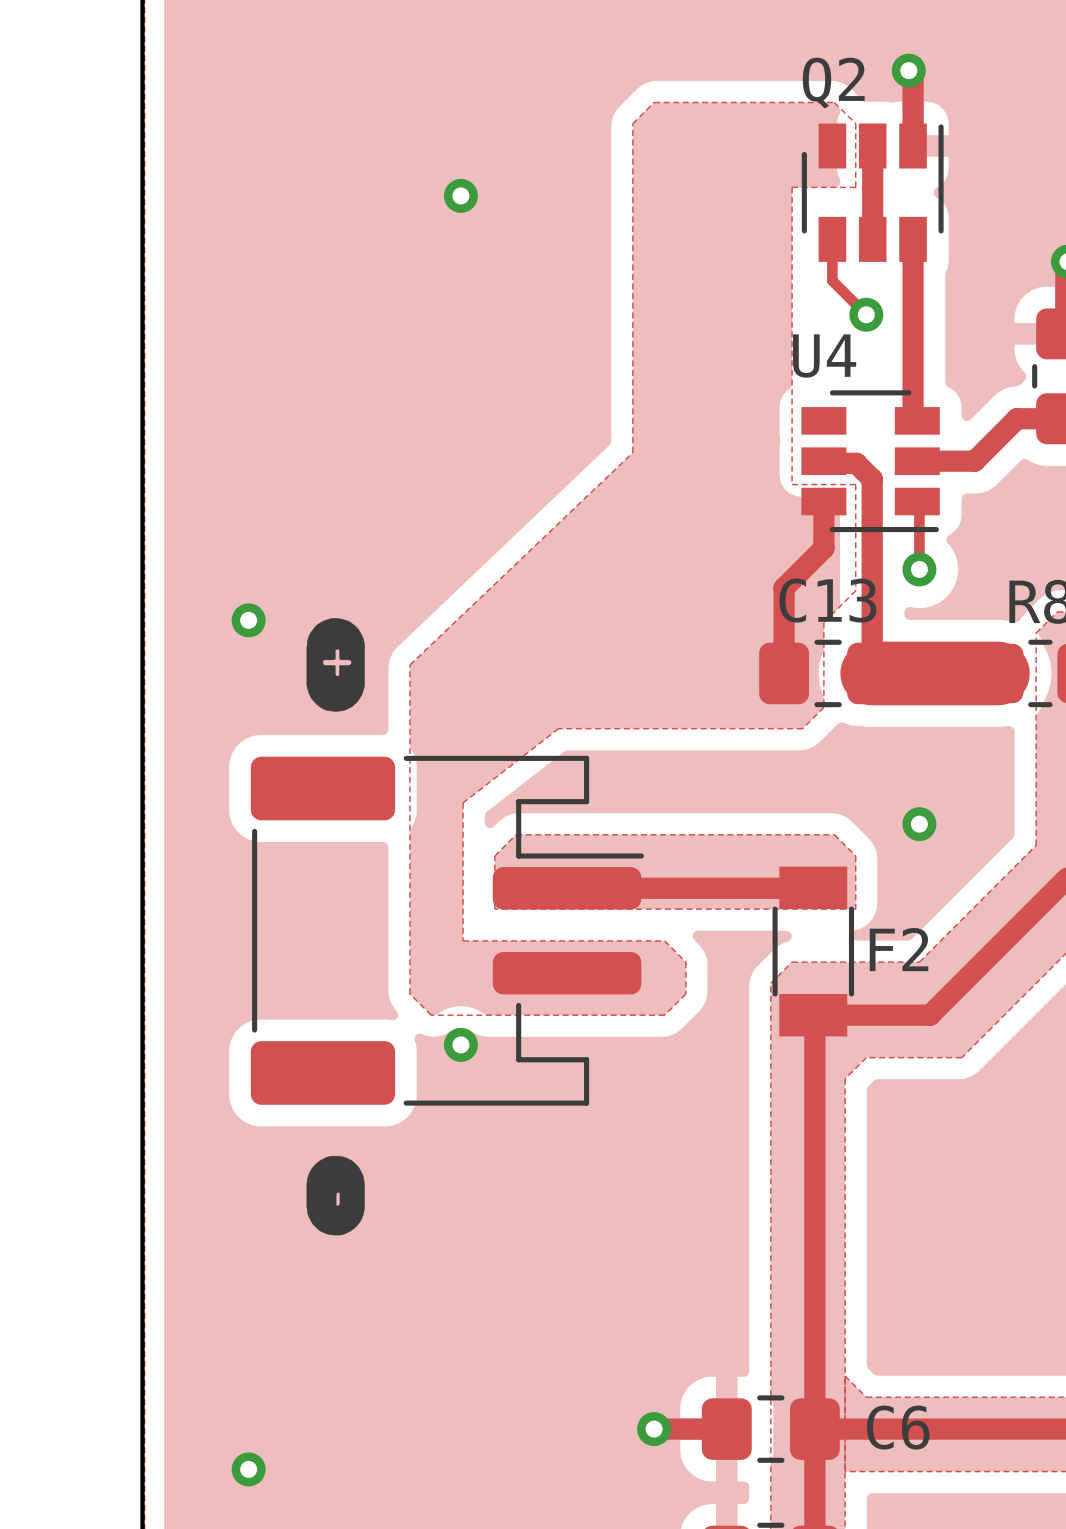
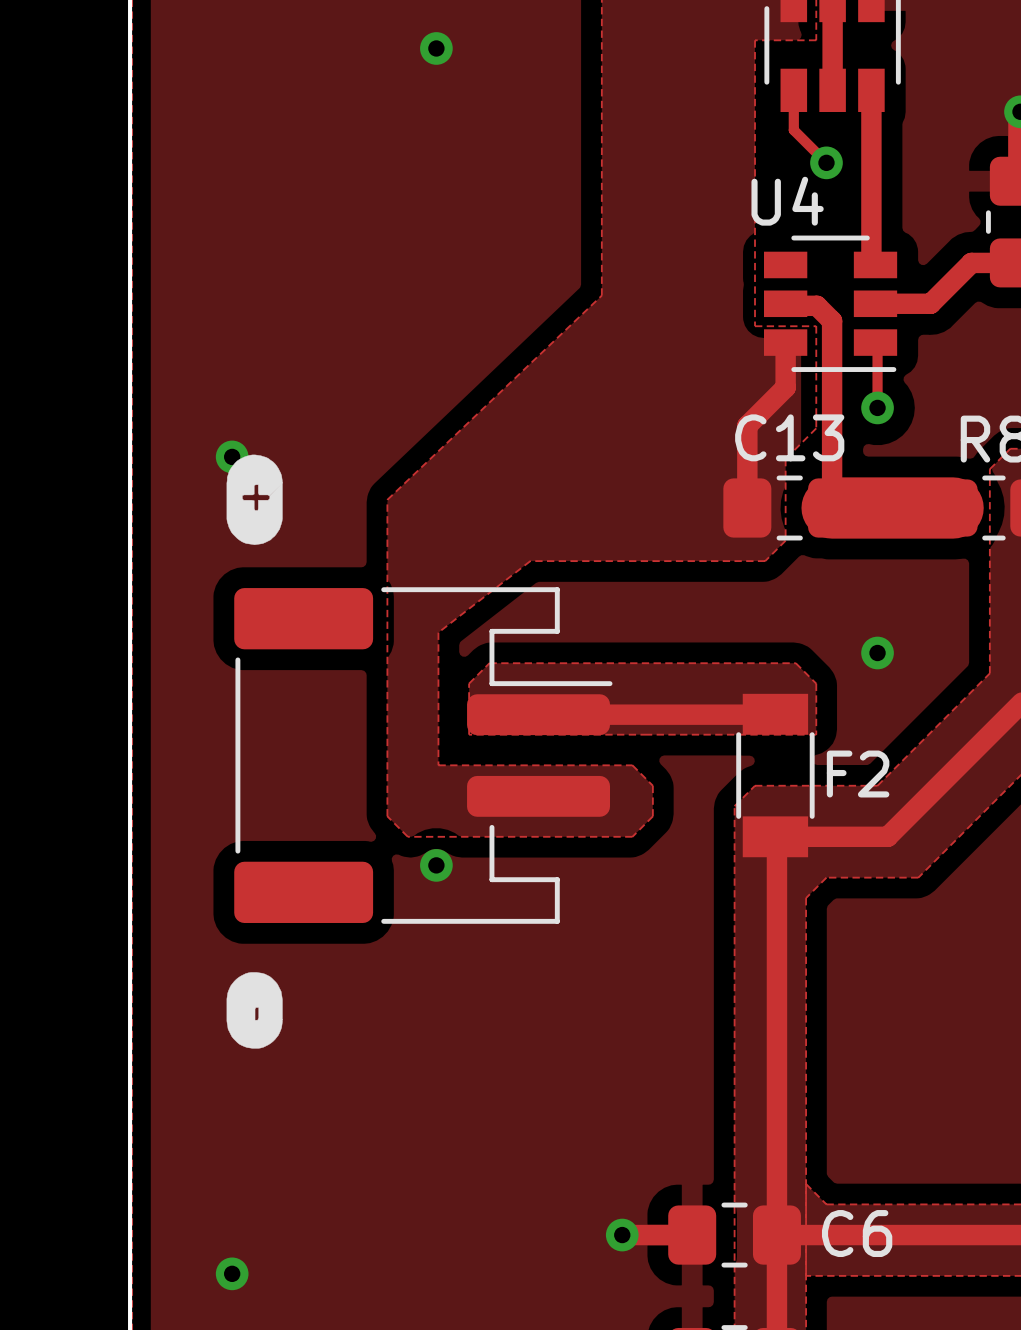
drawing position: (335, 664) -> (254, 499)
drawing position: (335, 1195) -> (254, 1010)

